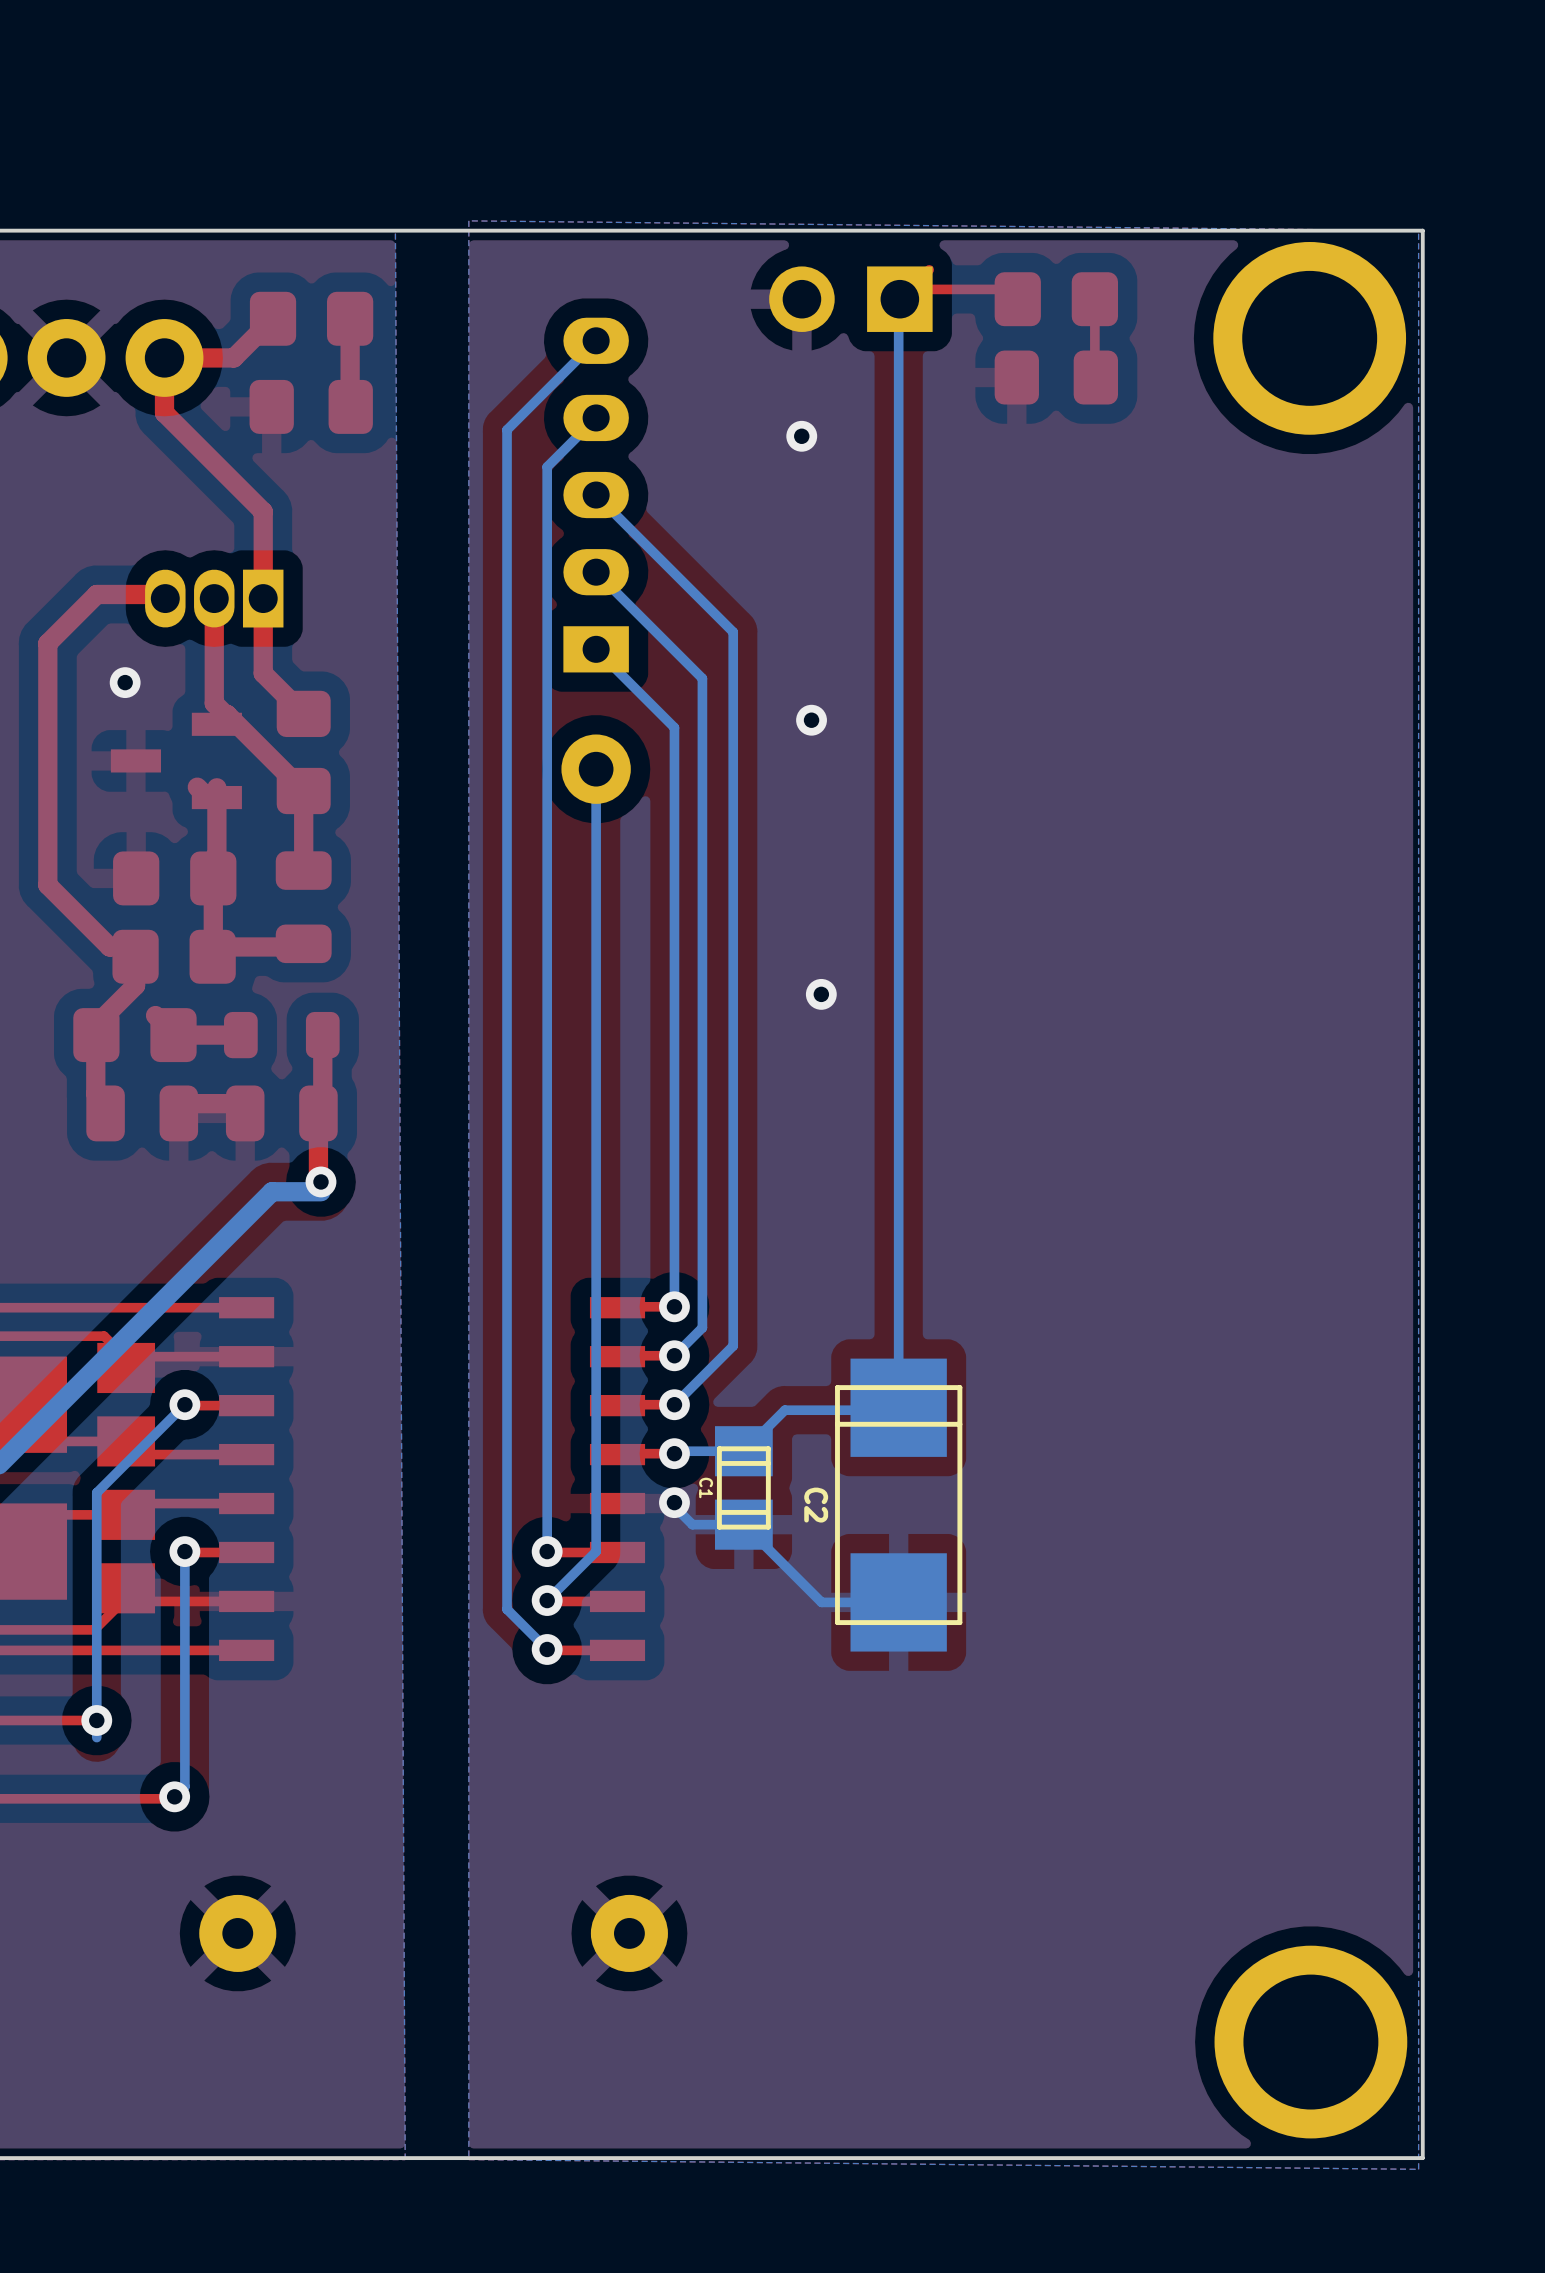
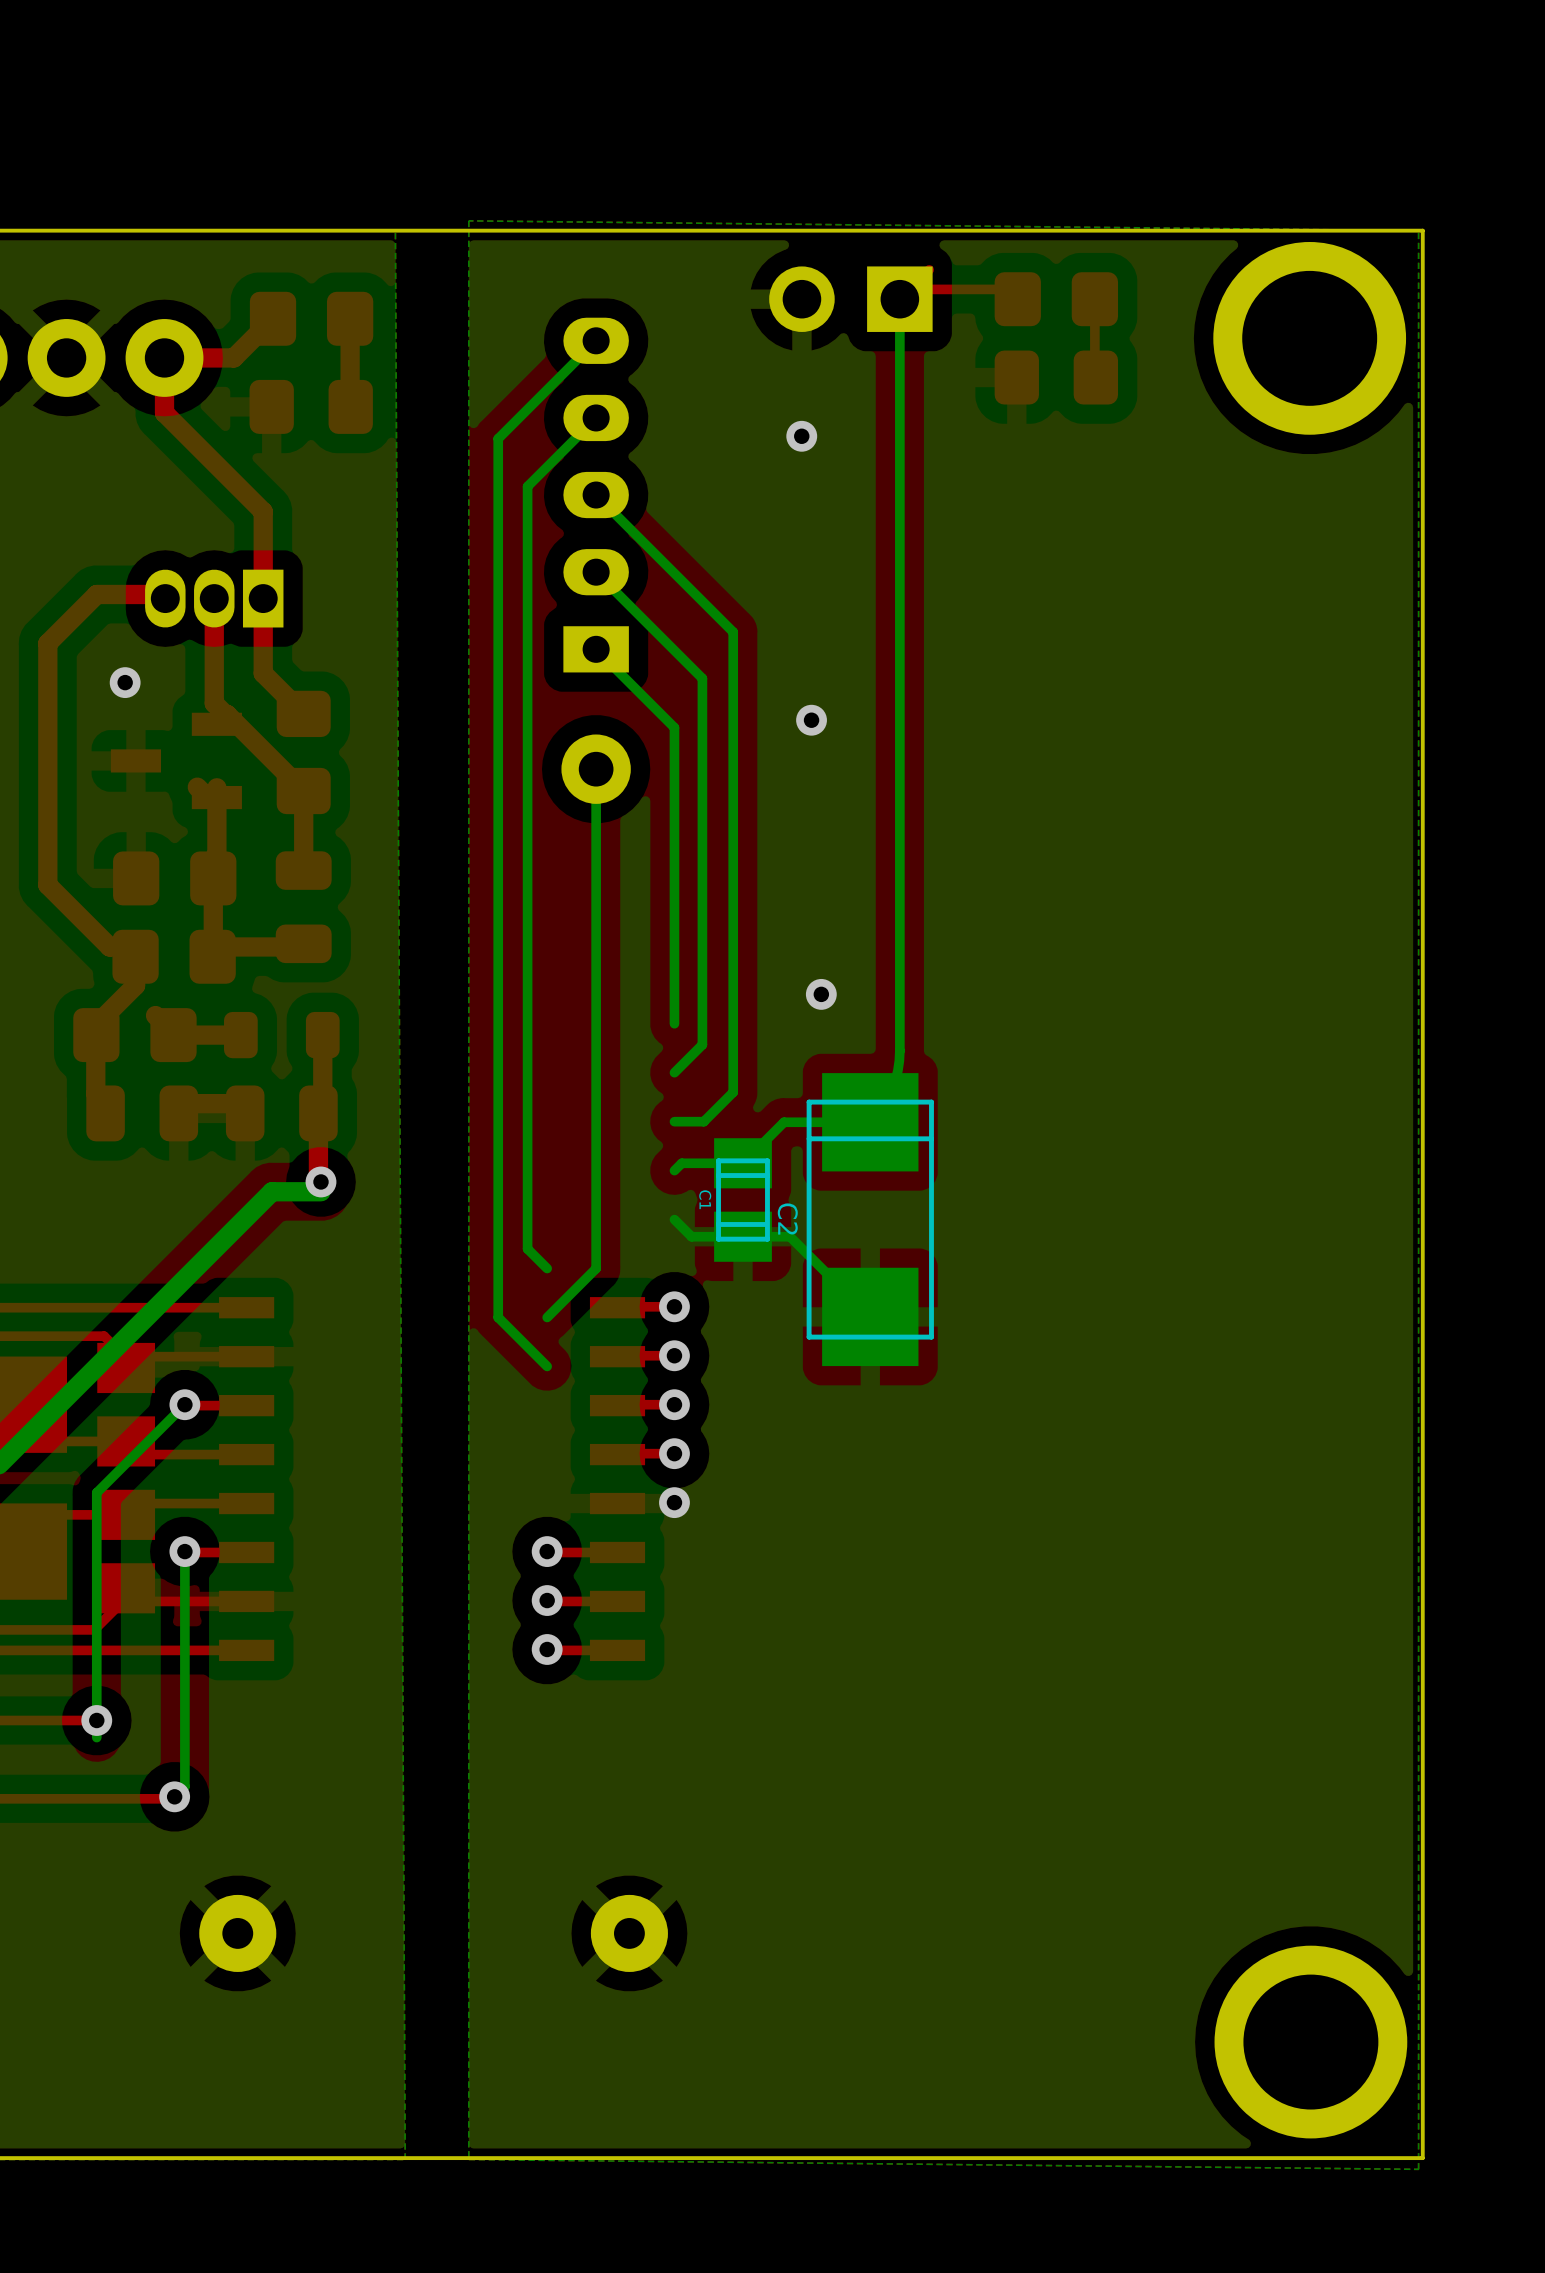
bottom track: (899, 299) (898, 1382) (871, 1410) (784, 1410) (743, 1451) (682, 1451) -> (899, 299) (899, 1050) (895, 1080) (882, 1106) (870, 1122) (784, 1122) (743, 1163) (681, 1163) (674, 1170)
bottom track: (507, 429) (507, 1609) (547, 1649) -> (507, 429) (498, 438) (498, 1317) (547, 1366)
bottom track: (547, 466) (547, 1551) -> (547, 466) (527, 486) (527, 1248) (547, 1268)
bottom track: (674, 1023) (674, 1306) -> none
bottom track: (702, 1044) (702, 1327) (674, 1355) -> (702, 1044) (674, 1072)
bottom track: (733, 1092) (733, 1345) (674, 1404) -> (733, 1092) (703, 1121) (674, 1121)
bottom track: none -> (674, 1219) (691, 1236) (790, 1236) (870, 1316)
bottom track: (596, 1268) (596, 1551) (547, 1600) -> (596, 1268) (547, 1317)
C1 position: (743, 1487) -> (743, 1200)
C2 position: (898, 1505) -> (870, 1219)
bottom track: (675, 1507) (692, 1524) (743, 1524) (821, 1602) (898, 1602) -> none

